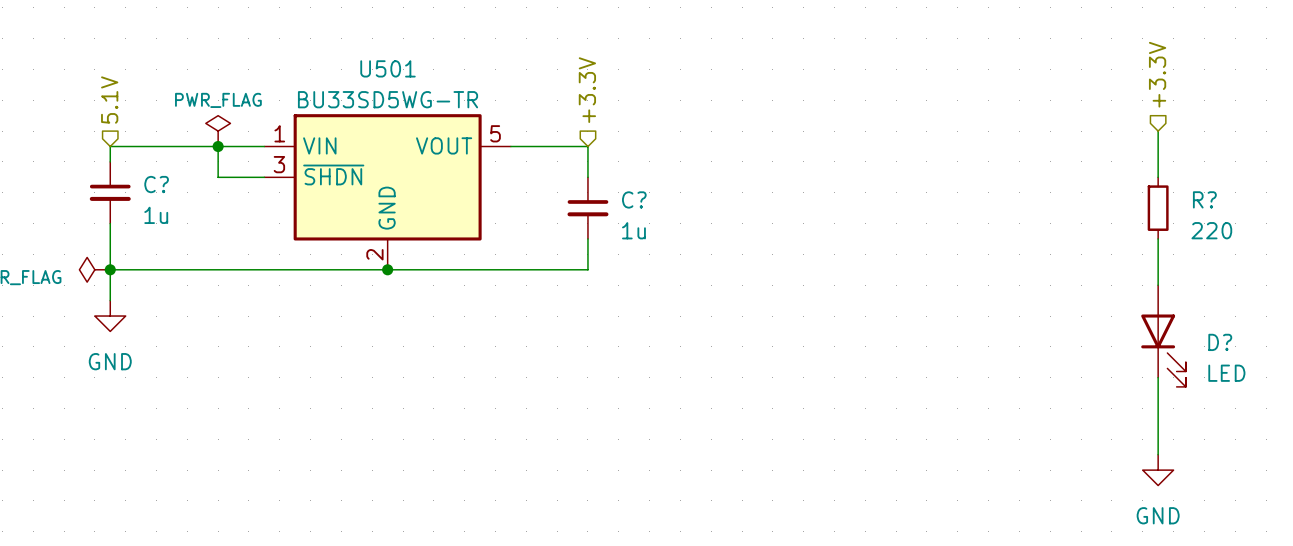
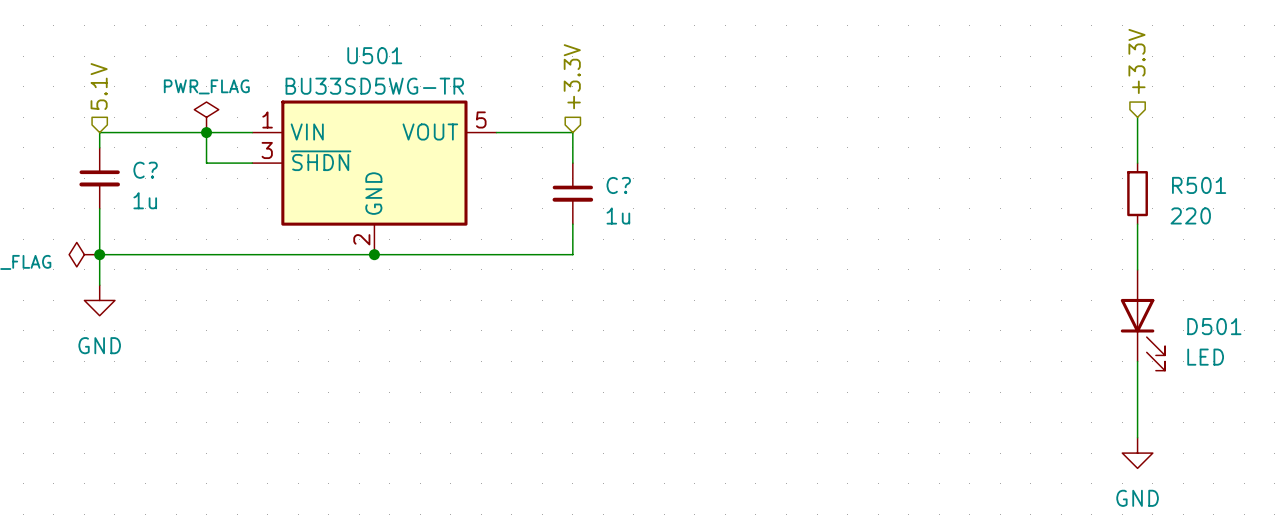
R? name: R? (1204, 199) -> R501 (1199, 185)
D? name: D? (1220, 342) -> D501 (1214, 326)

